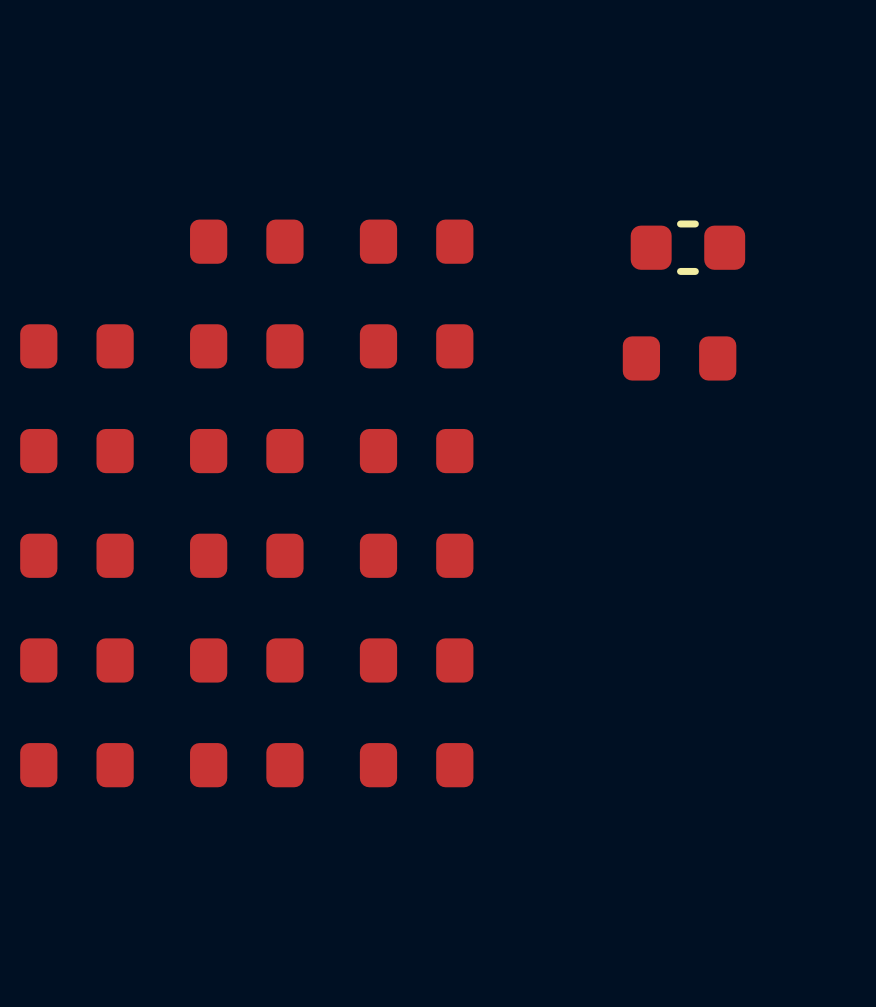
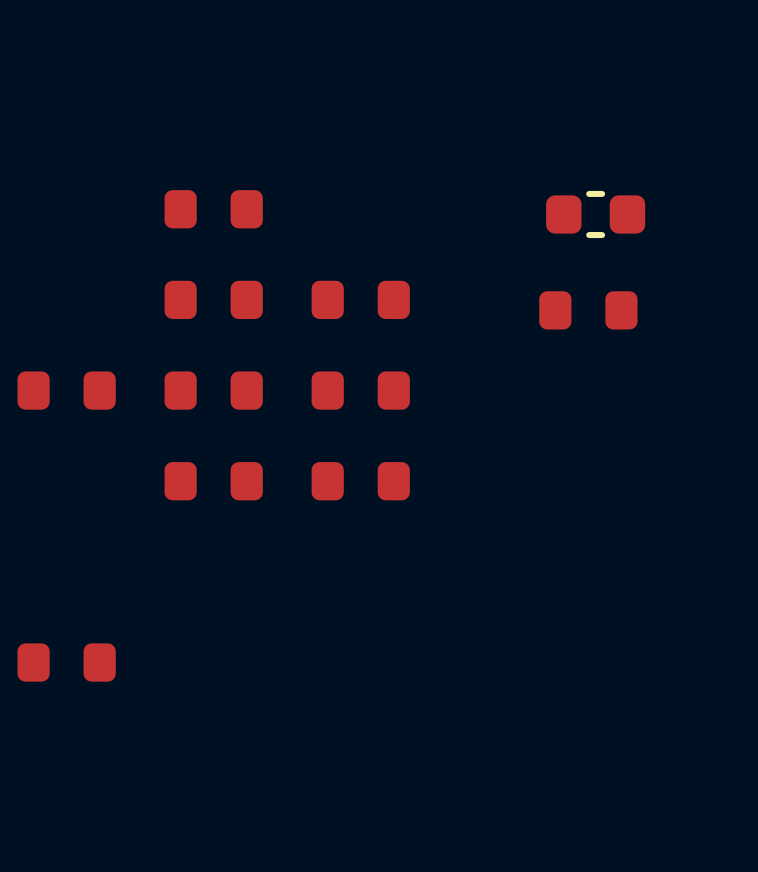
part: (416, 241) -> none
part: (76, 346) -> none
part: (76, 555) -> none
part: (76, 660) -> none
part: (246, 660) -> none
part: (416, 660) -> none
part: (246, 765) -> none
part: (416, 765) -> none

